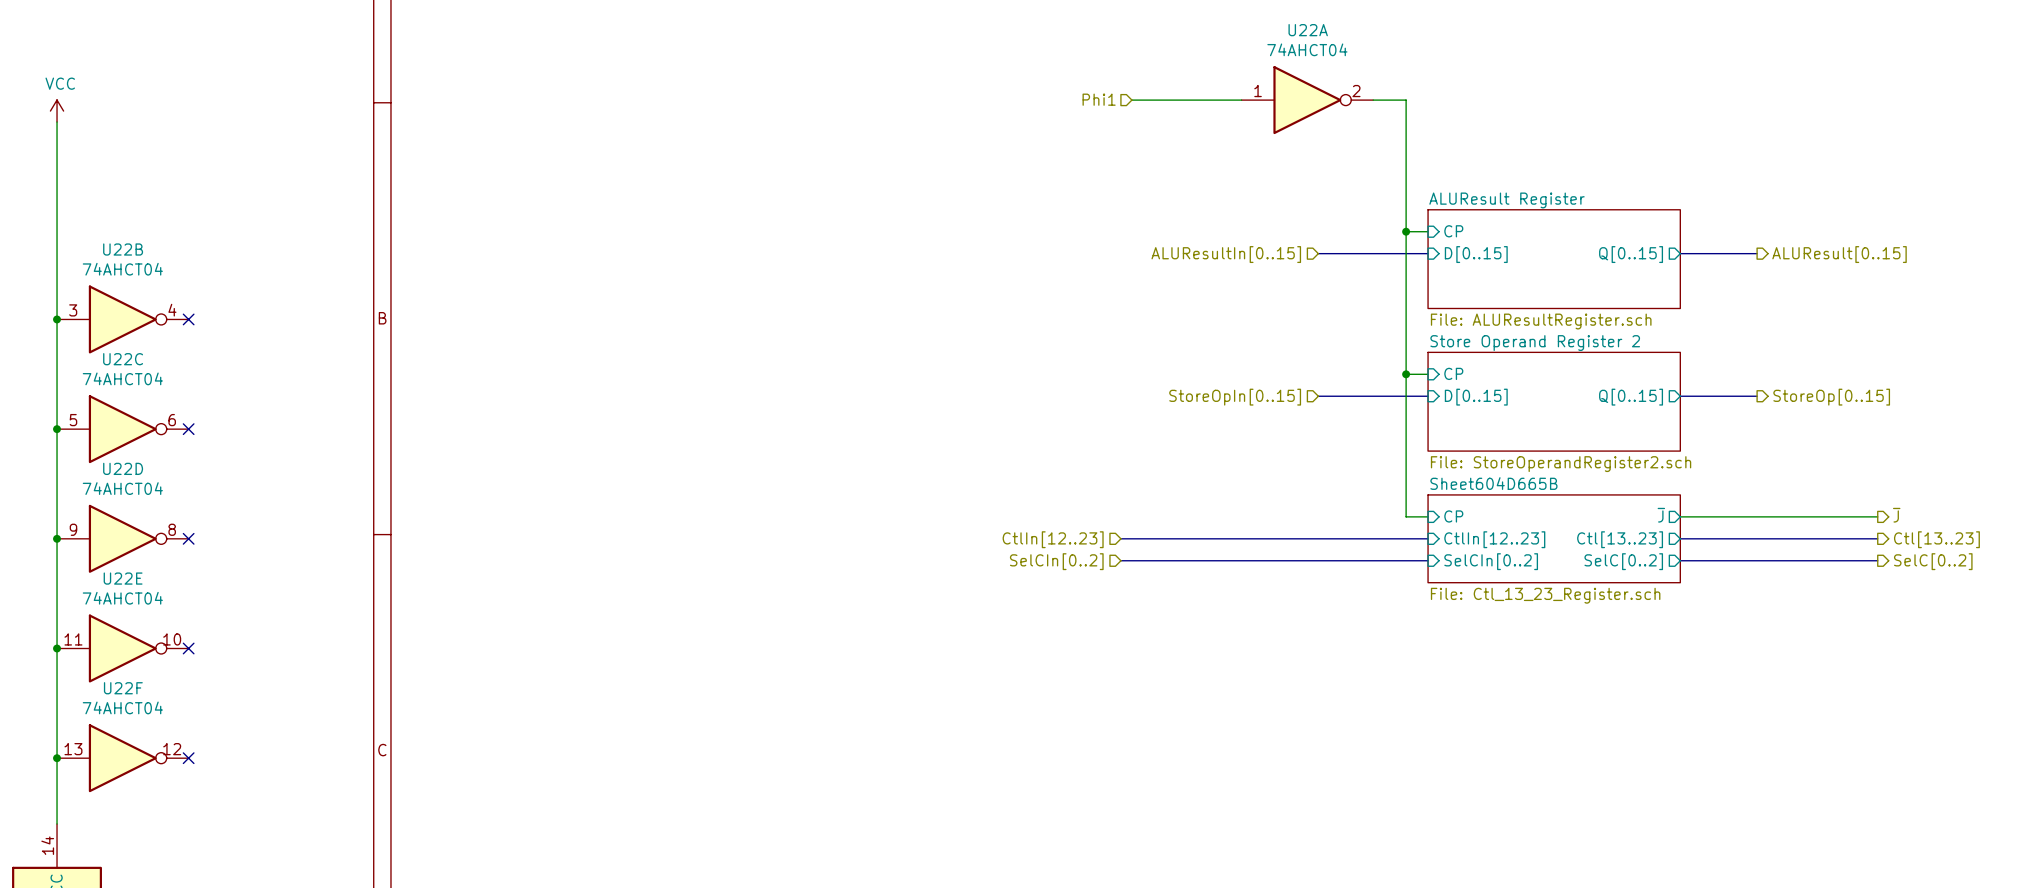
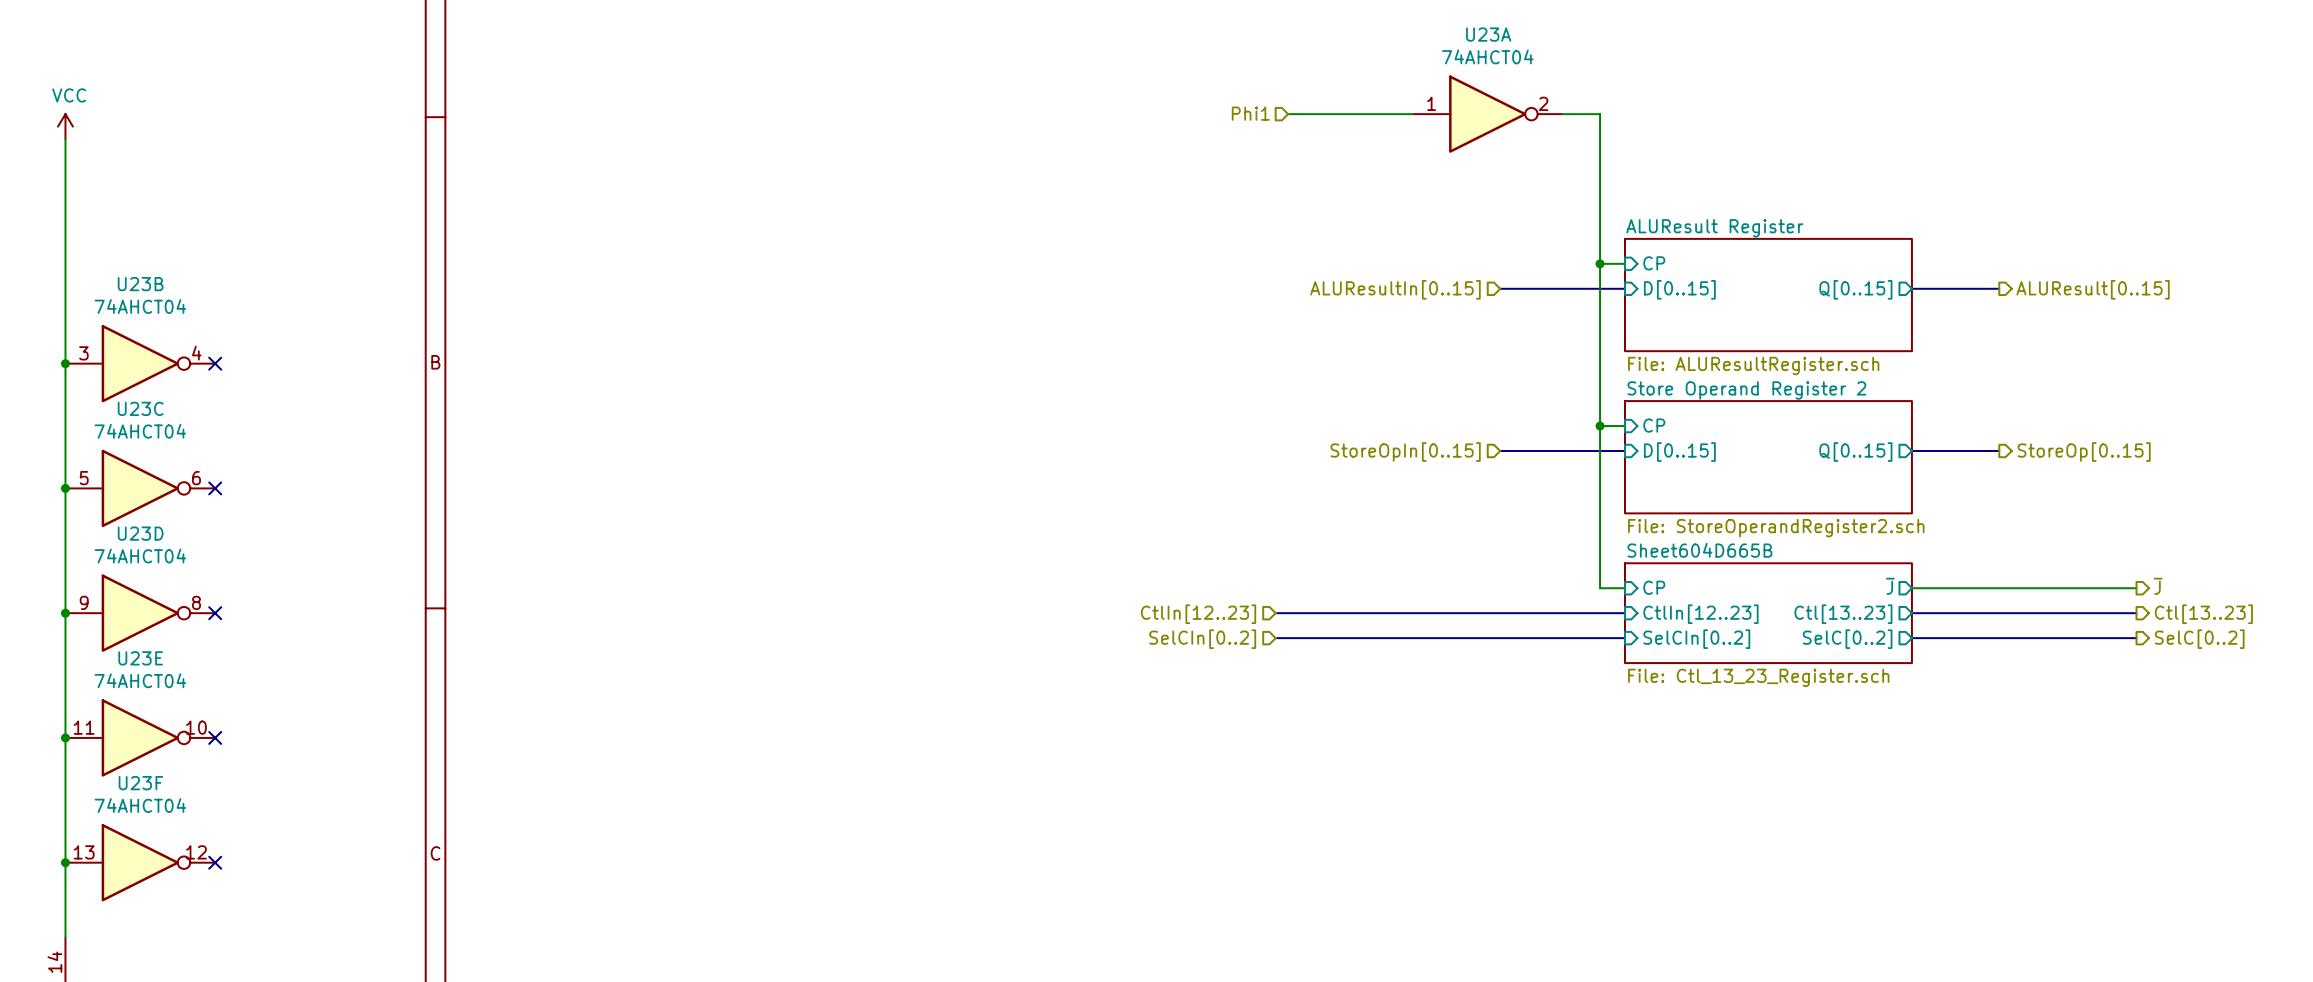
U22A name: U22A (1308, 30) -> U23A (1488, 34)
U22B name: U22B (123, 249) -> U23B (140, 284)
U22C name: U22C (123, 359) -> U23C (140, 408)
U22D name: U22D (123, 468) -> U23D (140, 533)
U22E name: U22E (123, 578) -> U23E (140, 658)
U22F name: U22F (123, 688) -> U23F (140, 783)

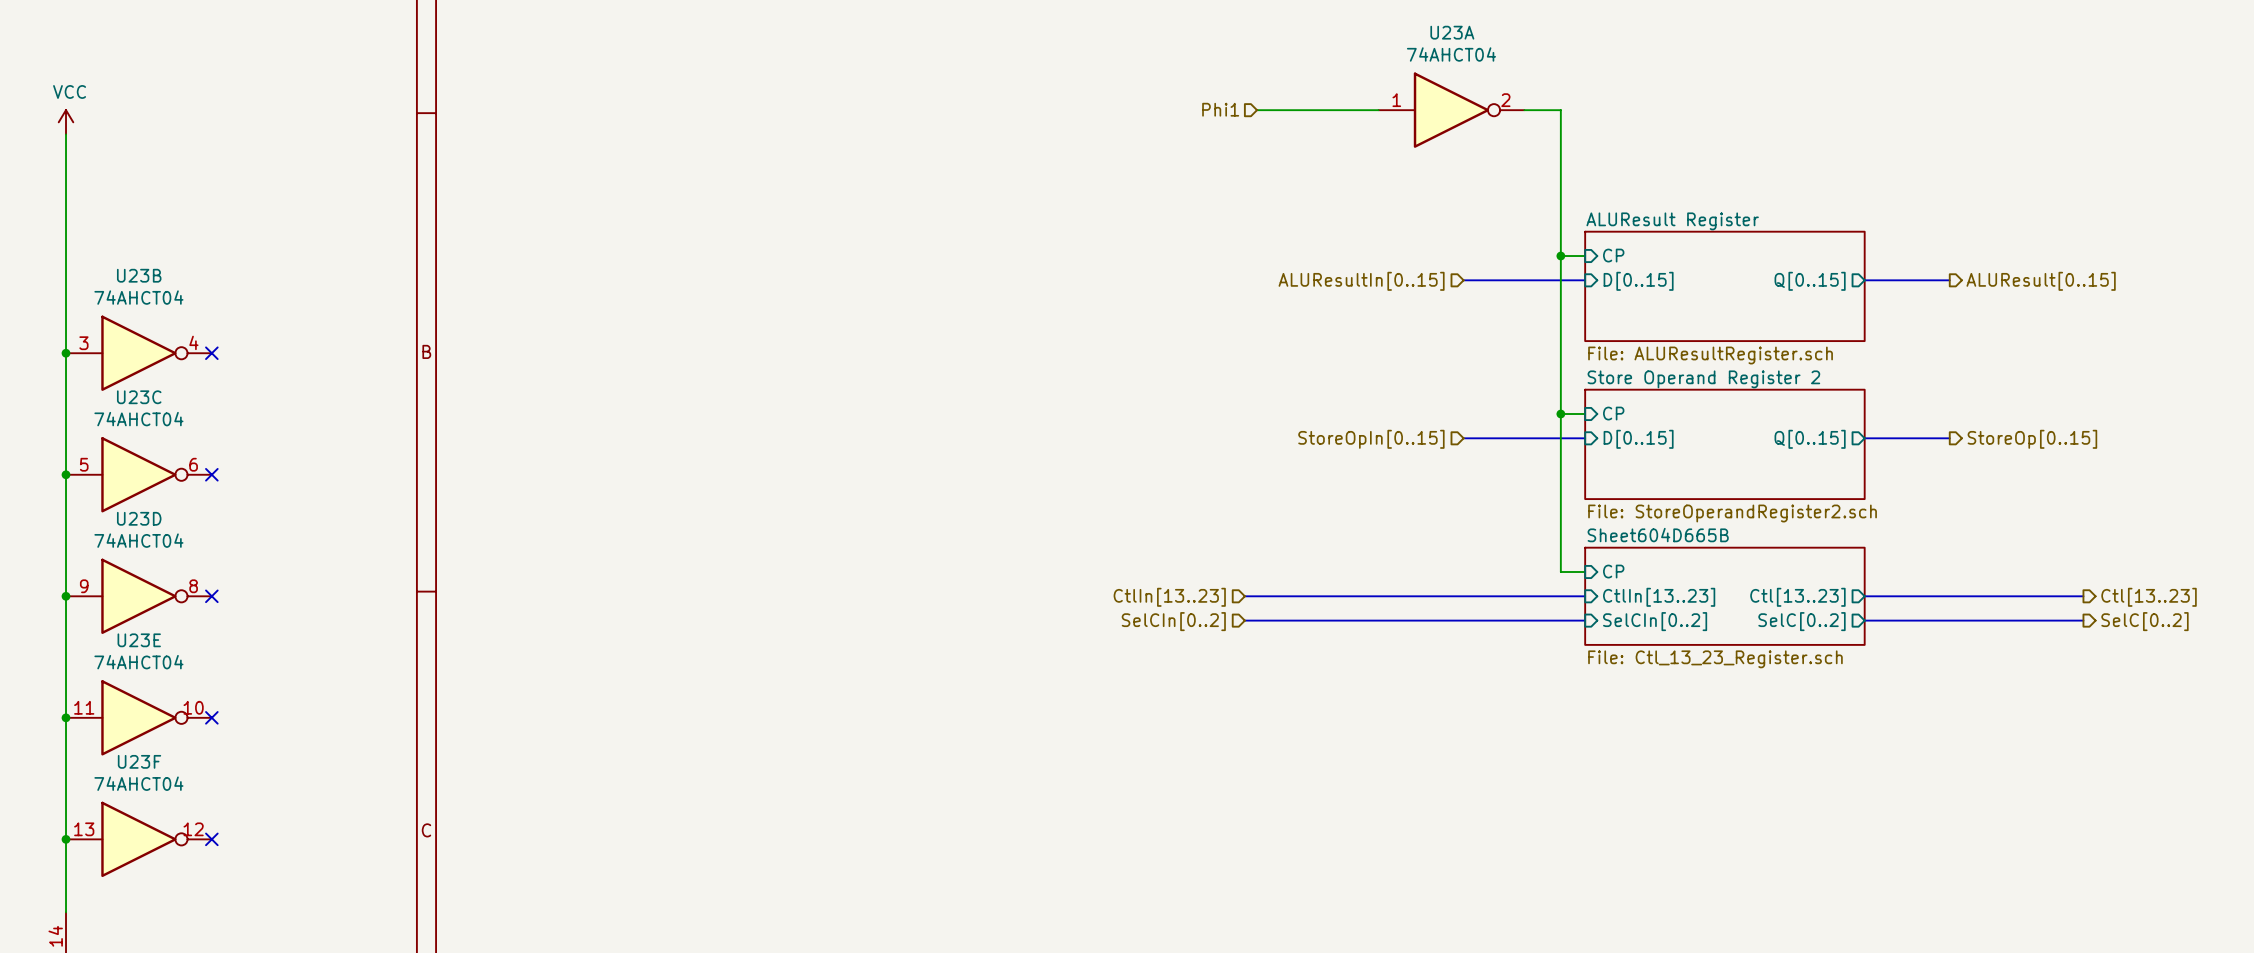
sheet pin: ~{J} (1890, 586) -> none
hierarchical label: ~{J} (2158, 586) -> none
wire: (1911, 588) (2136, 588) -> none
hierarchical label: CtlIn[12..23] (1198, 614) -> CtlIn[13..23] (1169, 597)
sheet pin: CtlIn[12..23] (1700, 614) -> CtlIn[13..23] (1659, 597)

